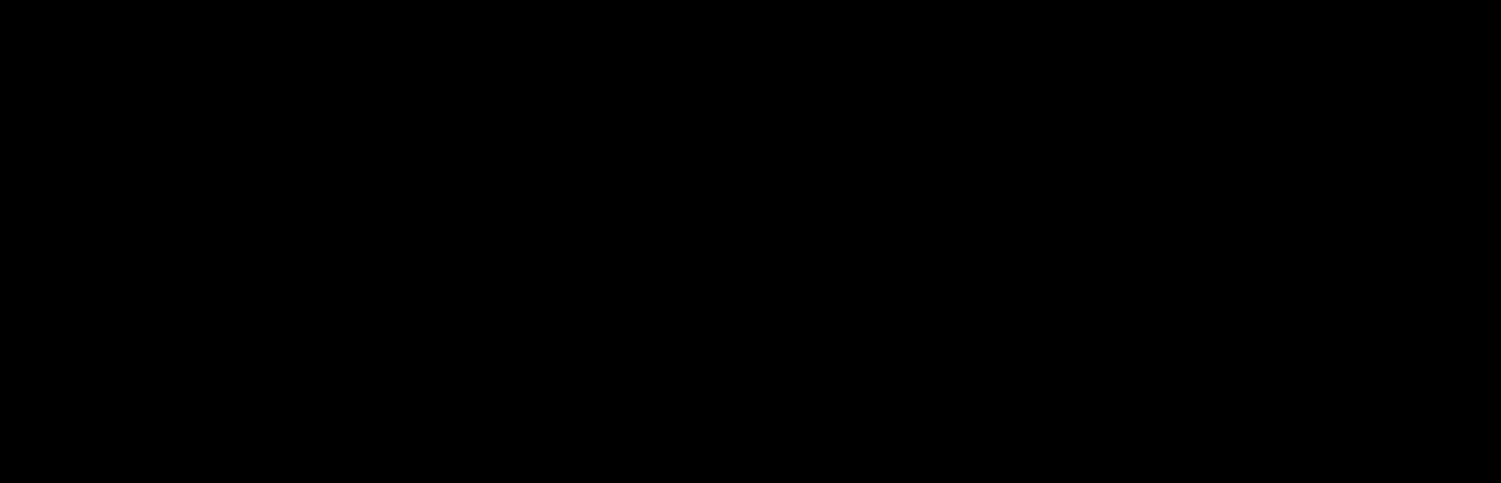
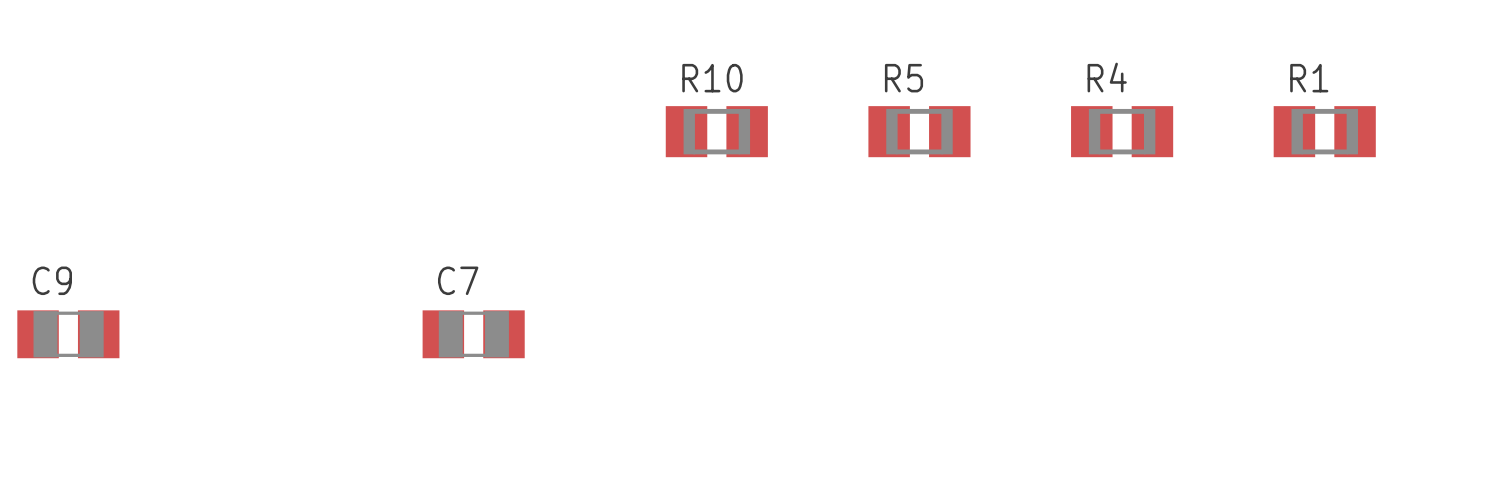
R10: none -> (716, 131)
R5: none -> (919, 131)
R4: none -> (1122, 131)
R1: none -> (1324, 131)
C9: none -> (68, 334)
C7: none -> (473, 334)

